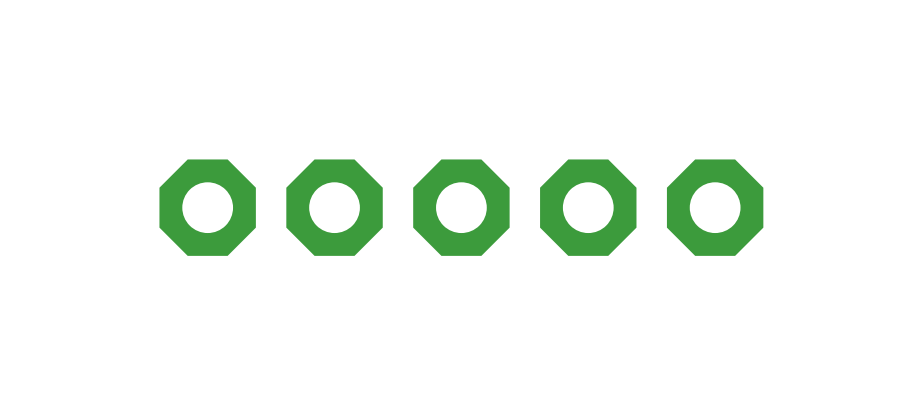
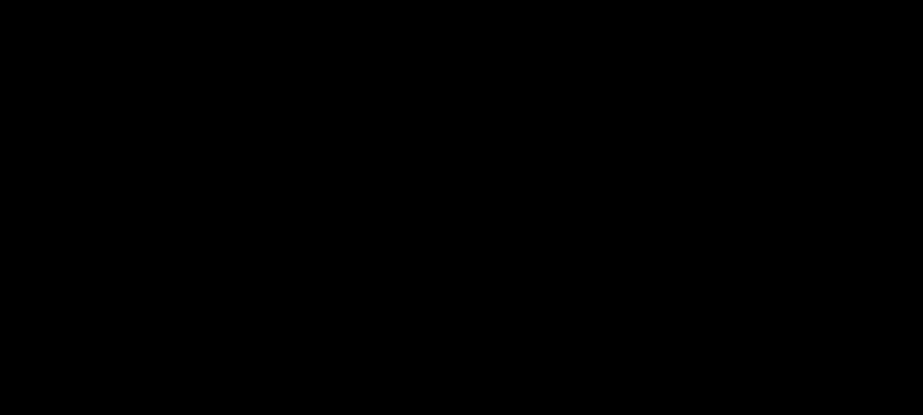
part: (461, 207) -> none

